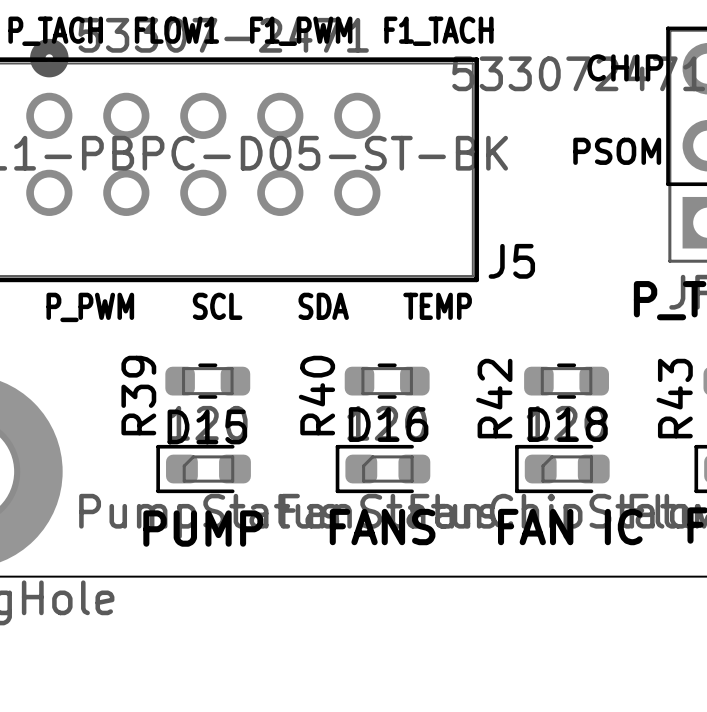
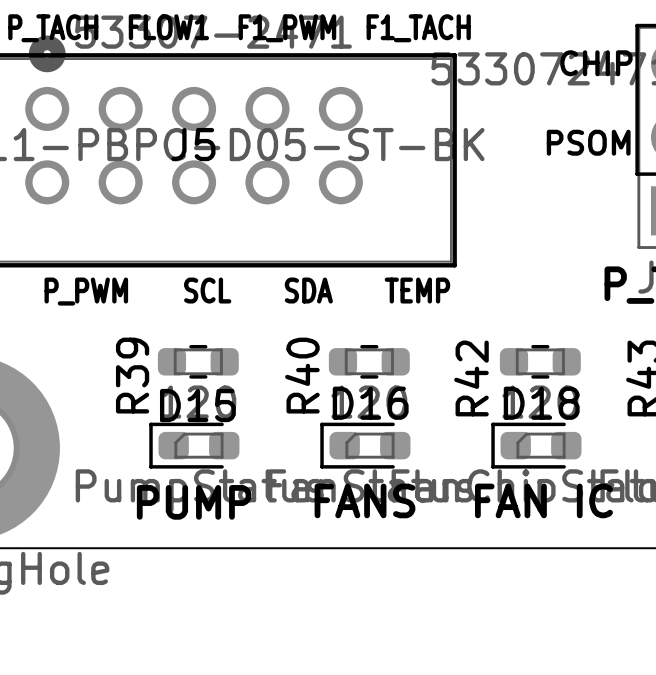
J5 name position: J5 (511, 261) -> J5 (193, 144)

